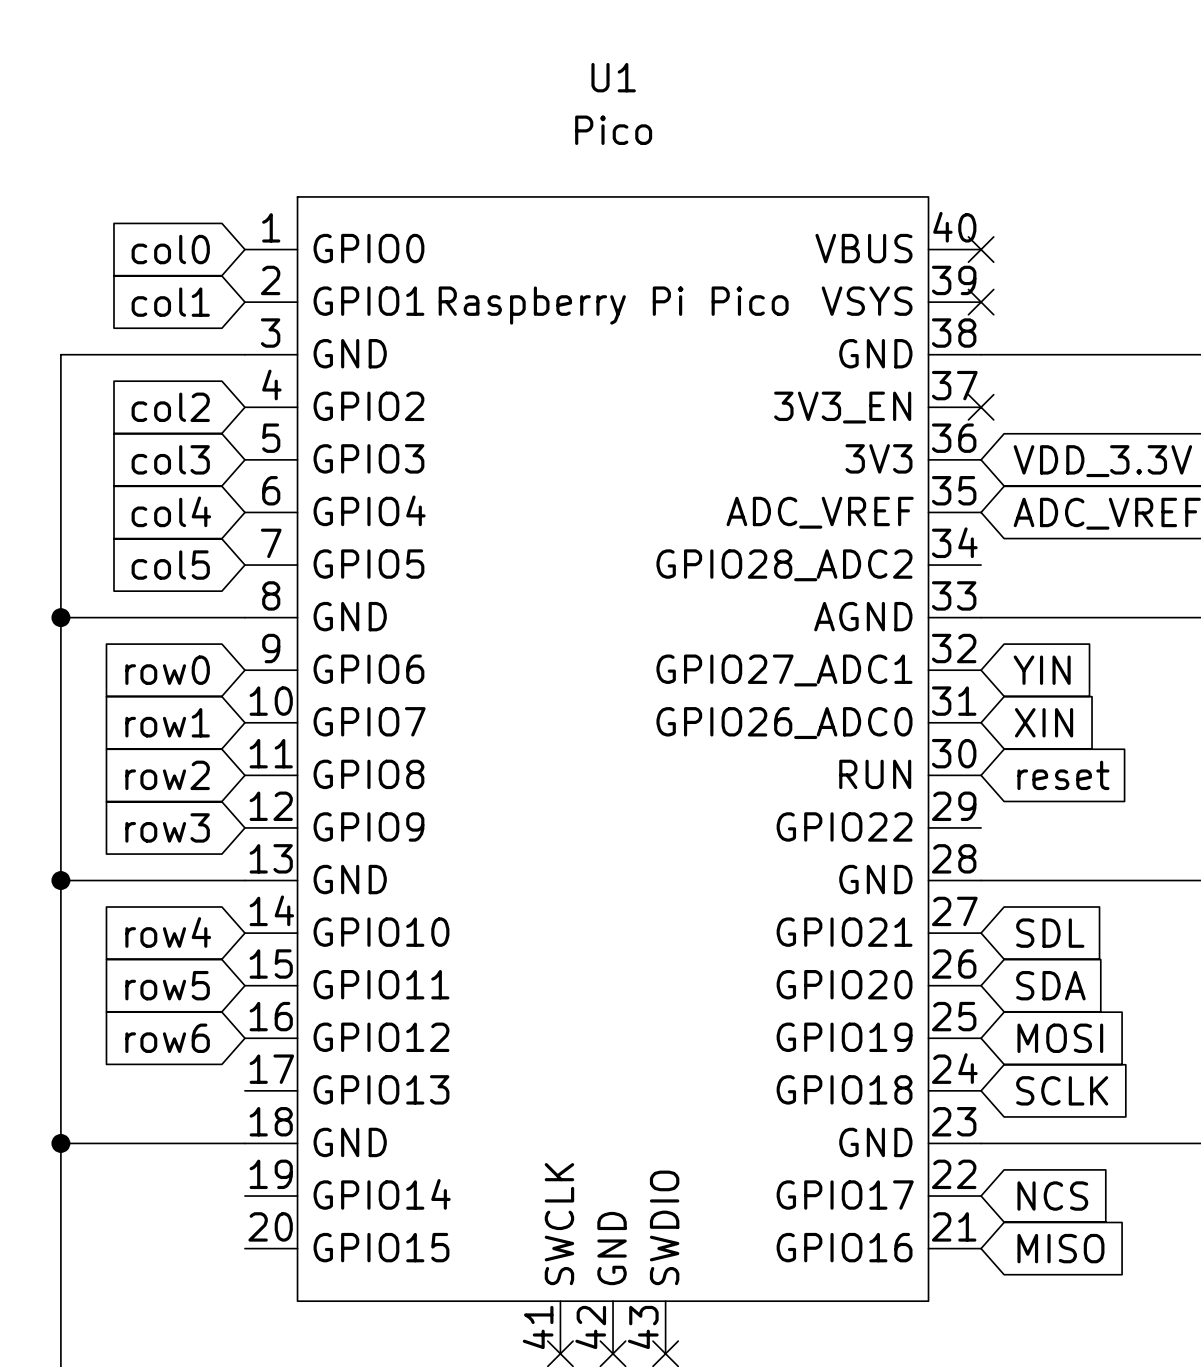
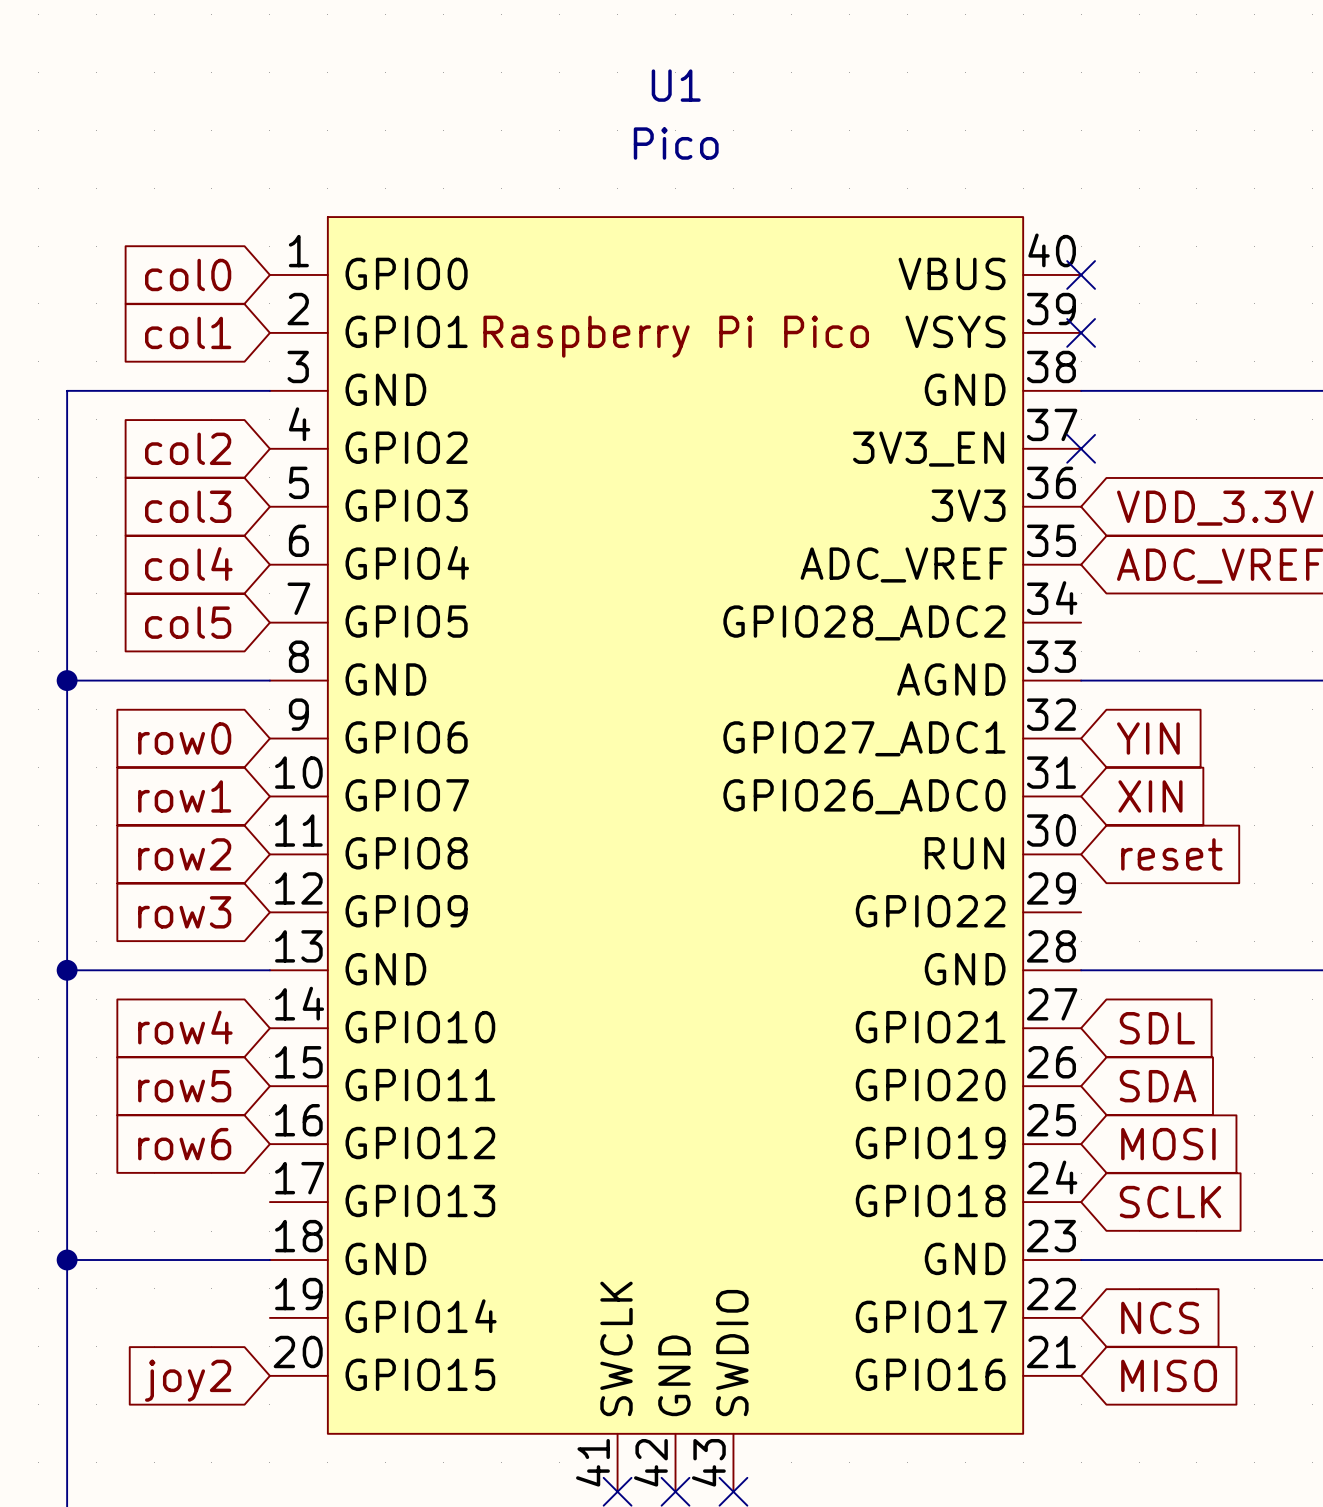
global label: none -> joy2 (188, 1380)

